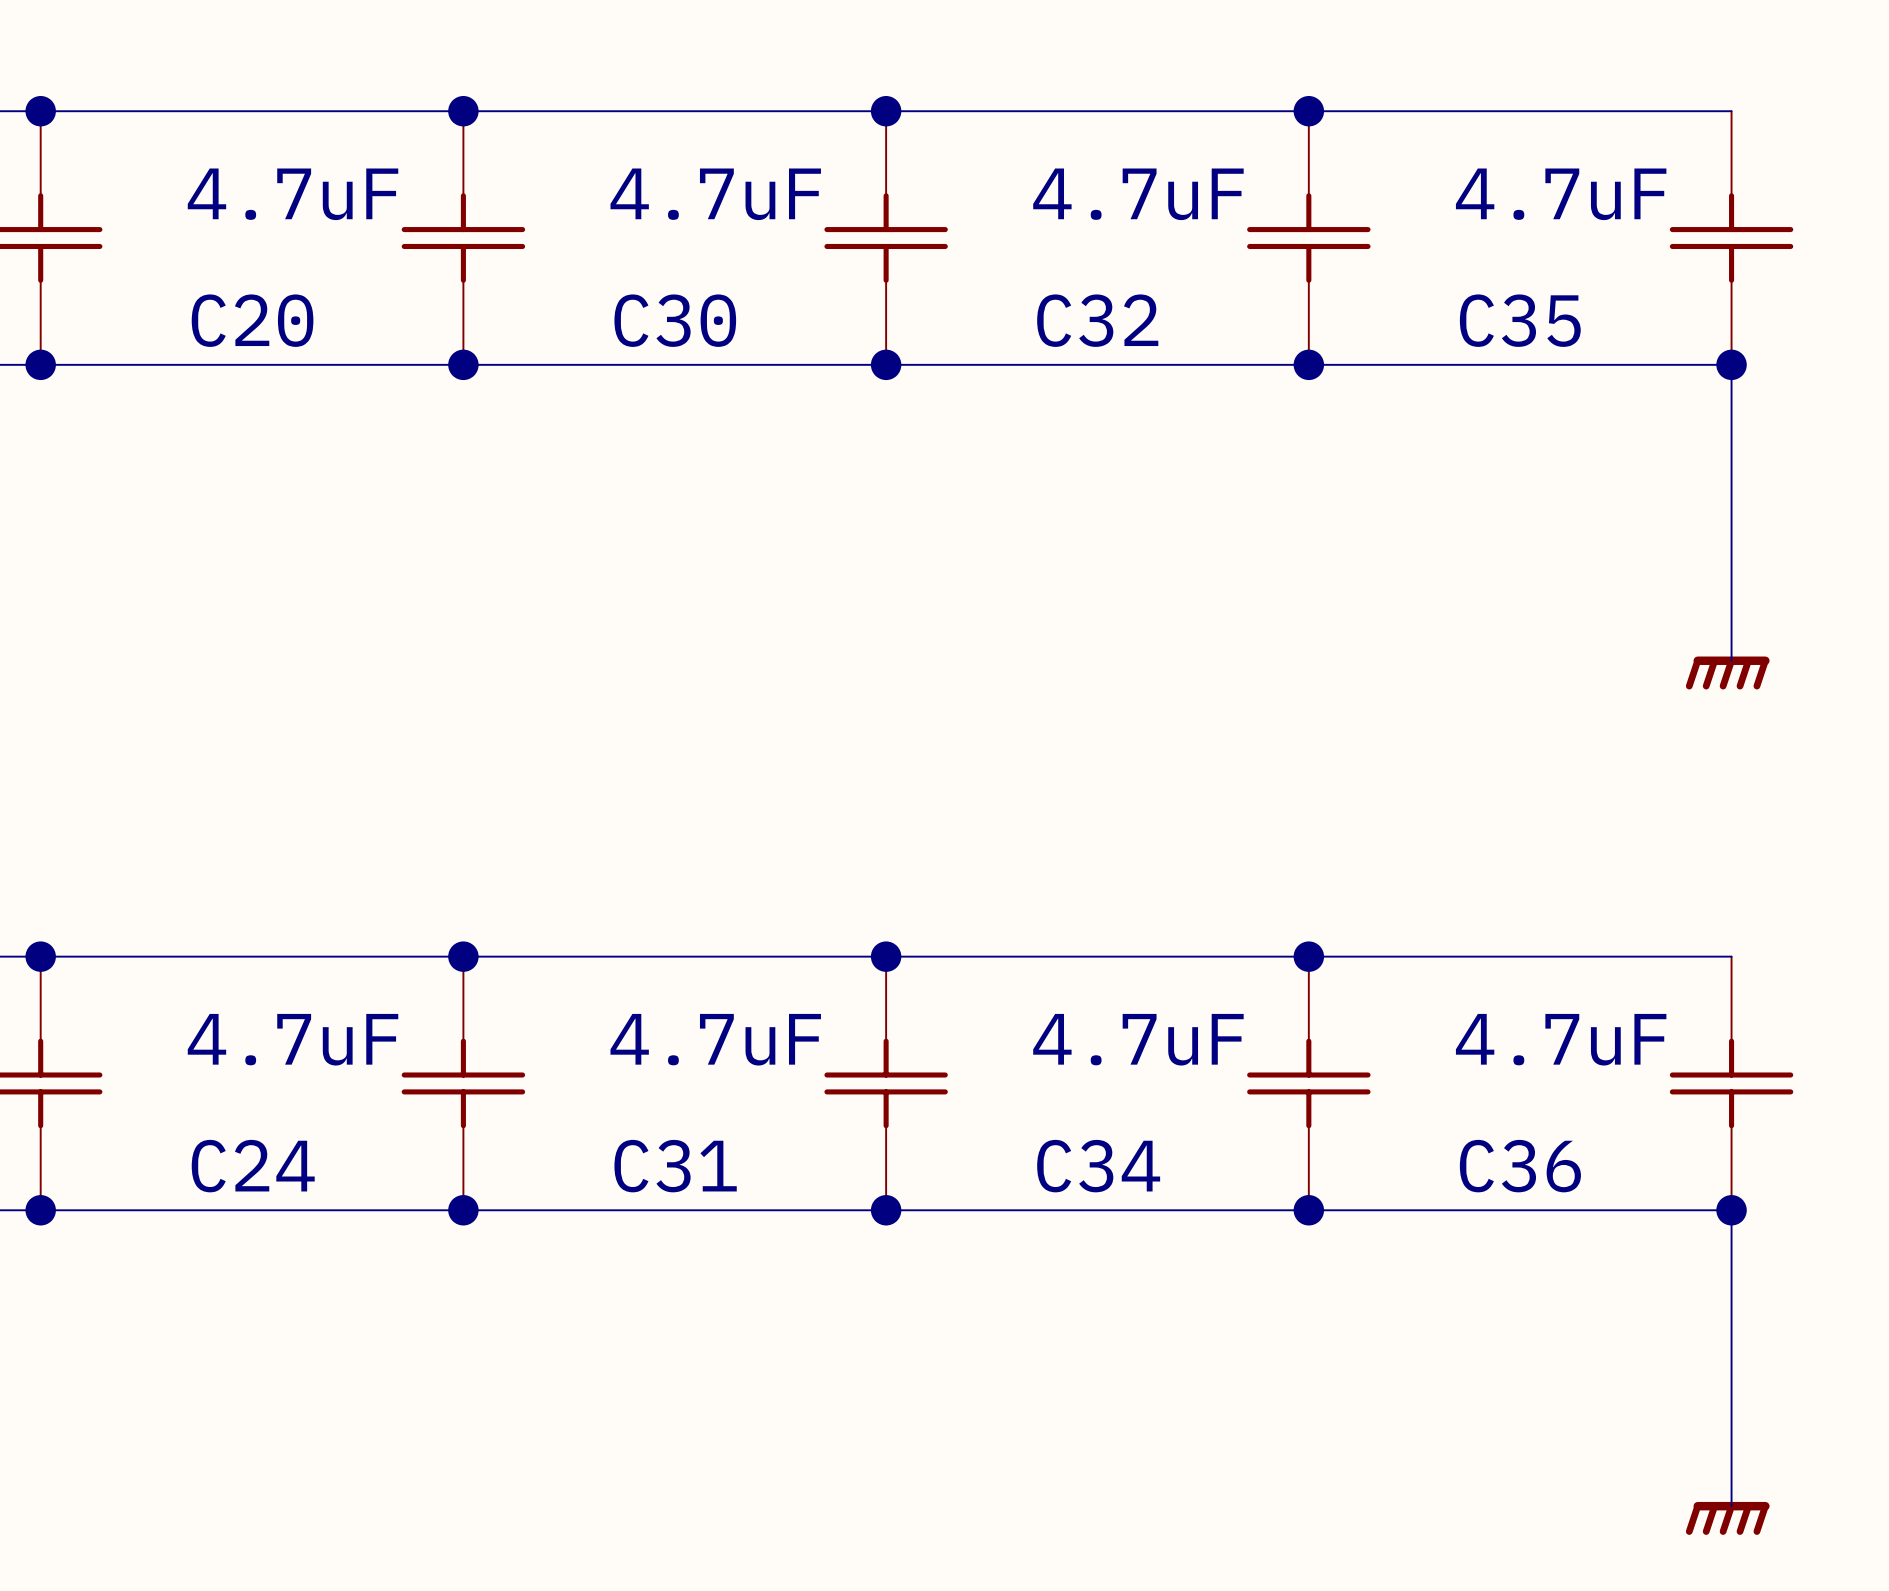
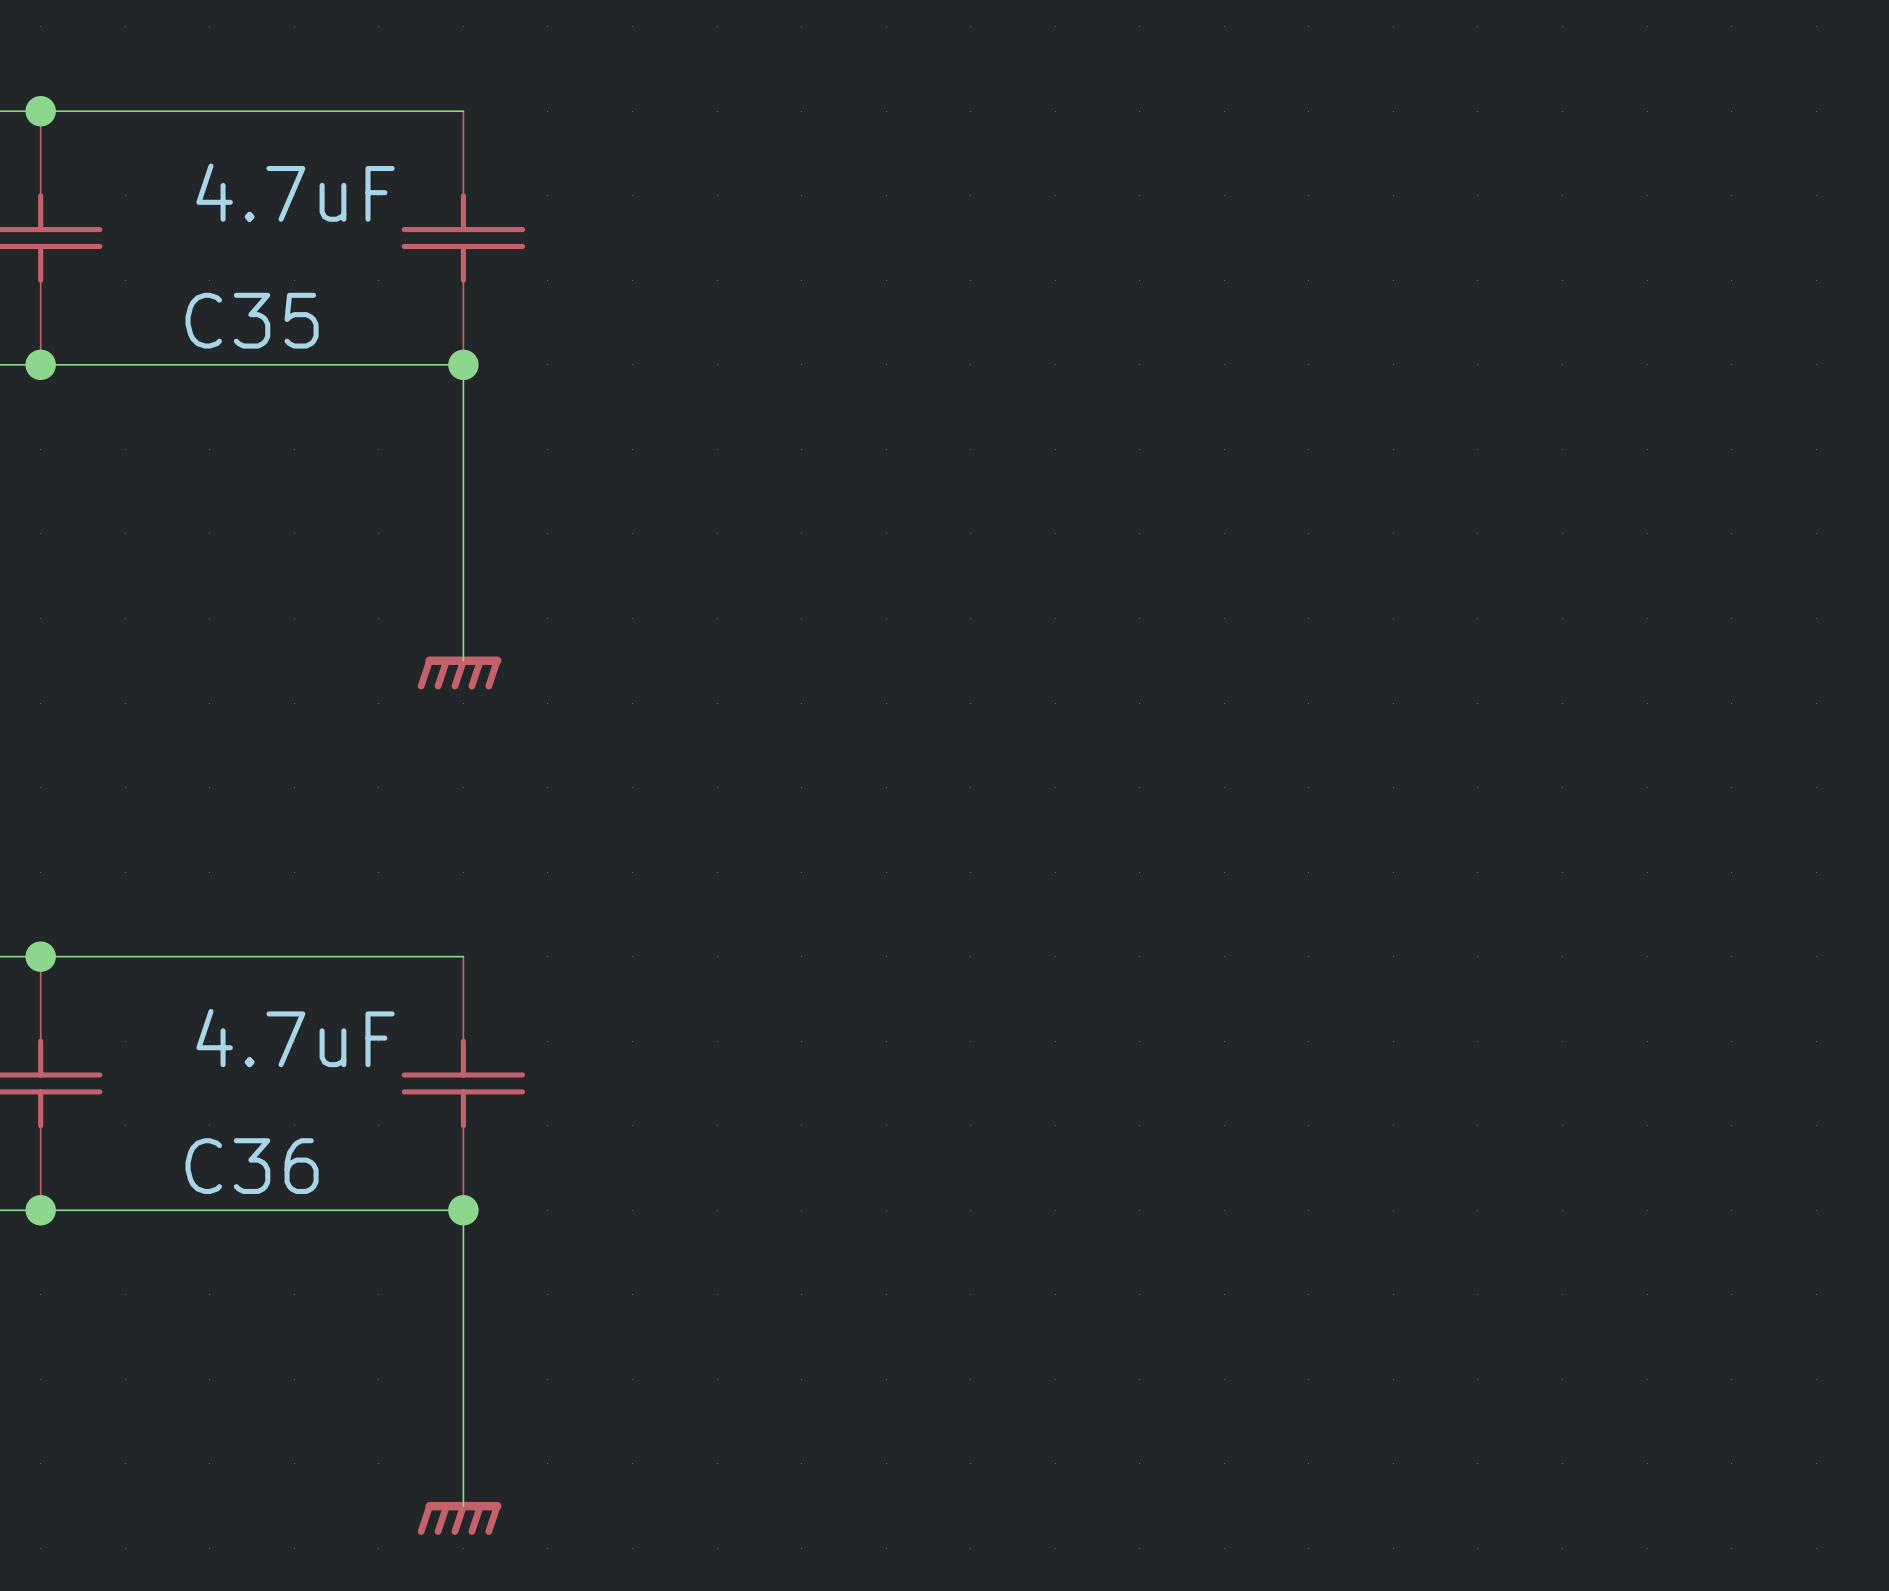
wire: (463, 111) (1731, 111) -> none
junction: (463, 111) -> none
junction: (886, 111) -> none
junction: (1308, 111) -> none
C30: 4.7uF (886, 238) -> none
C32: 4.7uF (1308, 238) -> none
C35: 4.7uF (1731, 238) -> none
C20 name: C20 (252, 320) -> C35 (252, 320)
wire: (463, 364) (1731, 364) (1731, 660) -> (463, 364) (463, 660)
junction: (886, 364) -> none
junction: (1308, 364) -> none
junction: (1731, 364) -> none
power symbol: none -> (459, 673)
power symbol: (1727, 673) -> none
wire: (463, 956) (1731, 956) -> none
junction: (463, 956) -> none
junction: (886, 956) -> none
junction: (1308, 956) -> none
C31: 4.7uF (886, 1083) -> none
C34: 4.7uF (1308, 1083) -> none
C36: 4.7uF (1731, 1083) -> none
C24 name: C24 (253, 1166) -> C36 (252, 1166)
wire: (463, 1210) (1731, 1210) (1731, 1506) -> (463, 1210) (463, 1506)
junction: (886, 1210) -> none
junction: (1308, 1210) -> none
junction: (1731, 1210) -> none
power symbol: none -> (459, 1518)
power symbol: (1727, 1518) -> none

